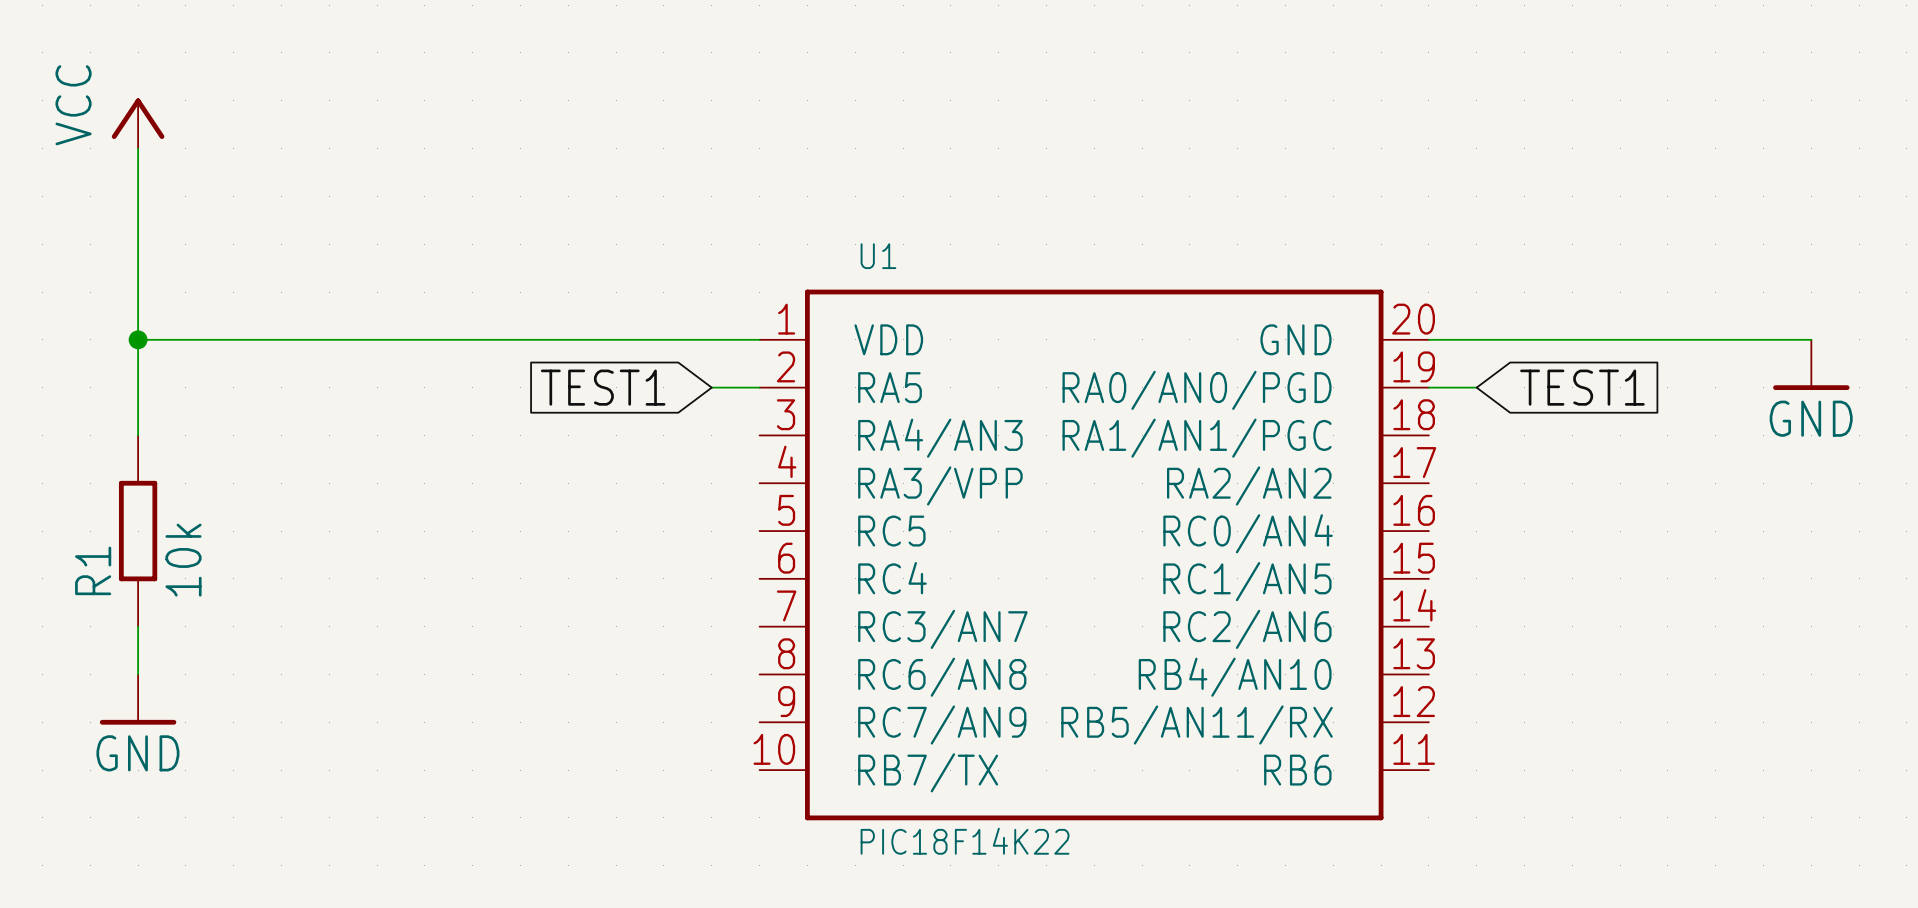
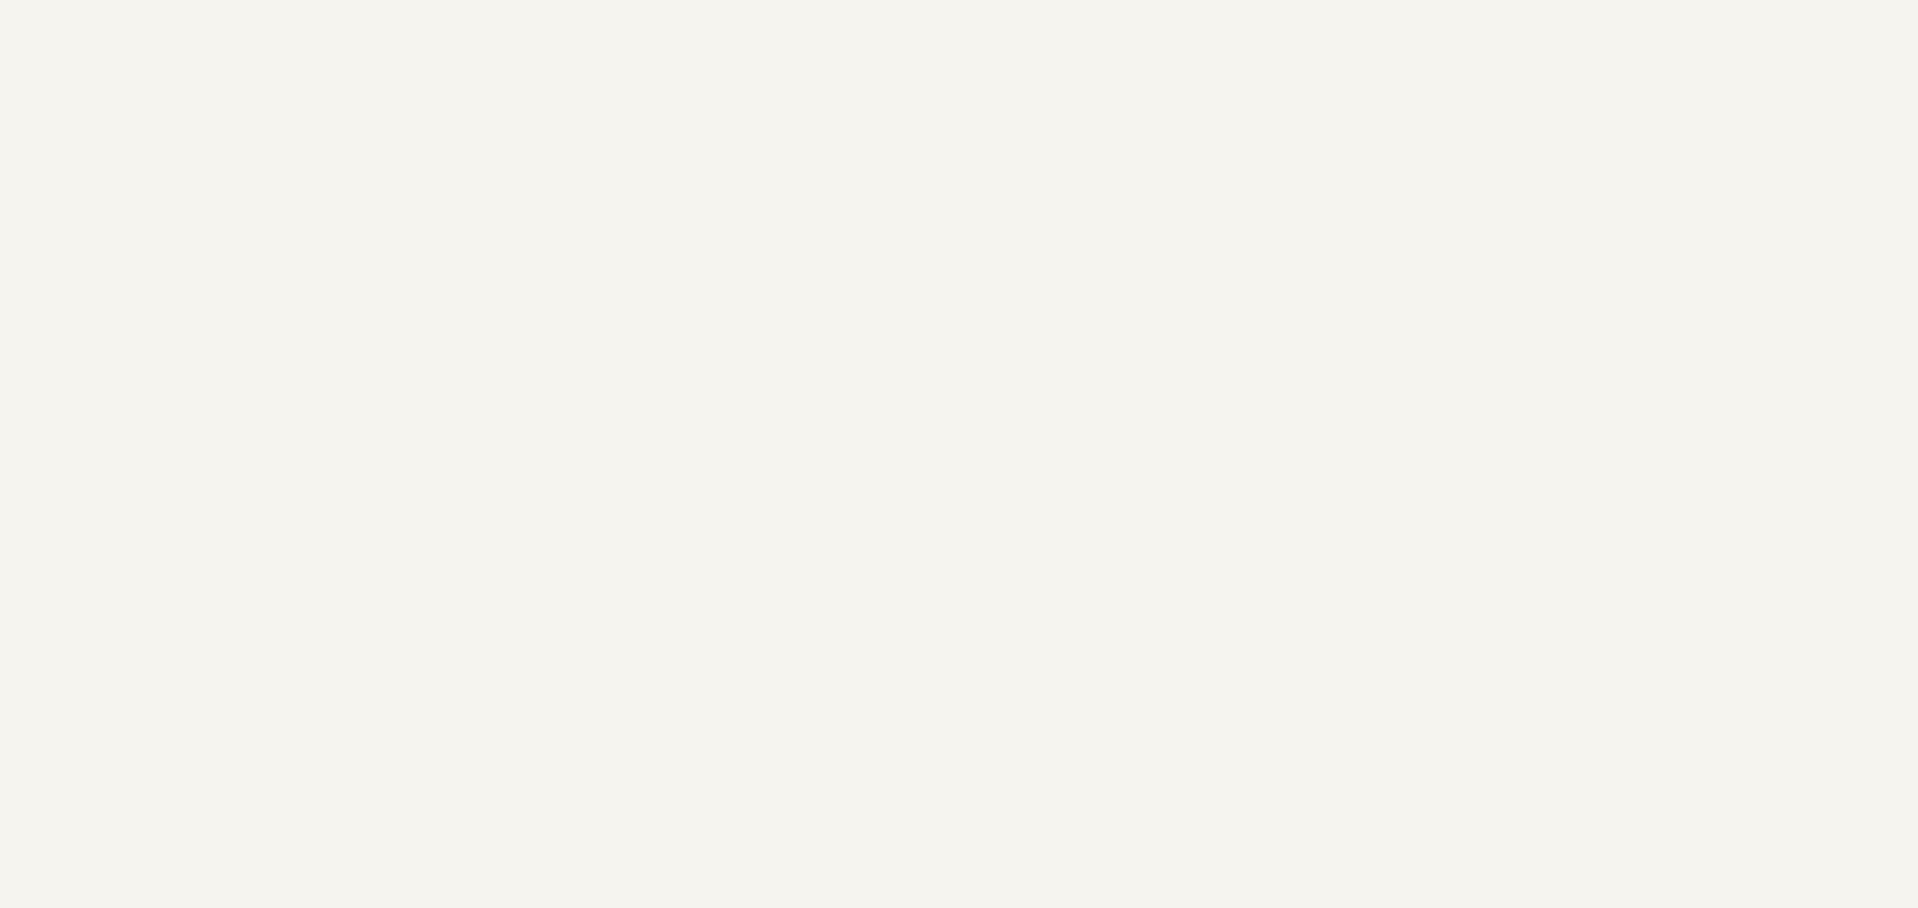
power symbol: VCC (138, 123) -> none
wire: (138, 148) (138, 435) -> none
wire: (138, 339) (759, 339) -> none
junction: (138, 339) -> none
wire: (1428, 339) (1811, 339) -> none
power symbol: GND (1811, 364) -> none
global label: TEST1 (603, 387) -> none
wire: (711, 387) (759, 387) -> none
wire: (1428, 387) (1476, 387) -> none
global label: TEST1 (1582, 387) -> none
R1: 10k (138, 531) -> none
U1: PIC18F14K22 (1094, 554) -> none
wire: (138, 626) (138, 674) -> none
power symbol: GND (138, 699) -> none

